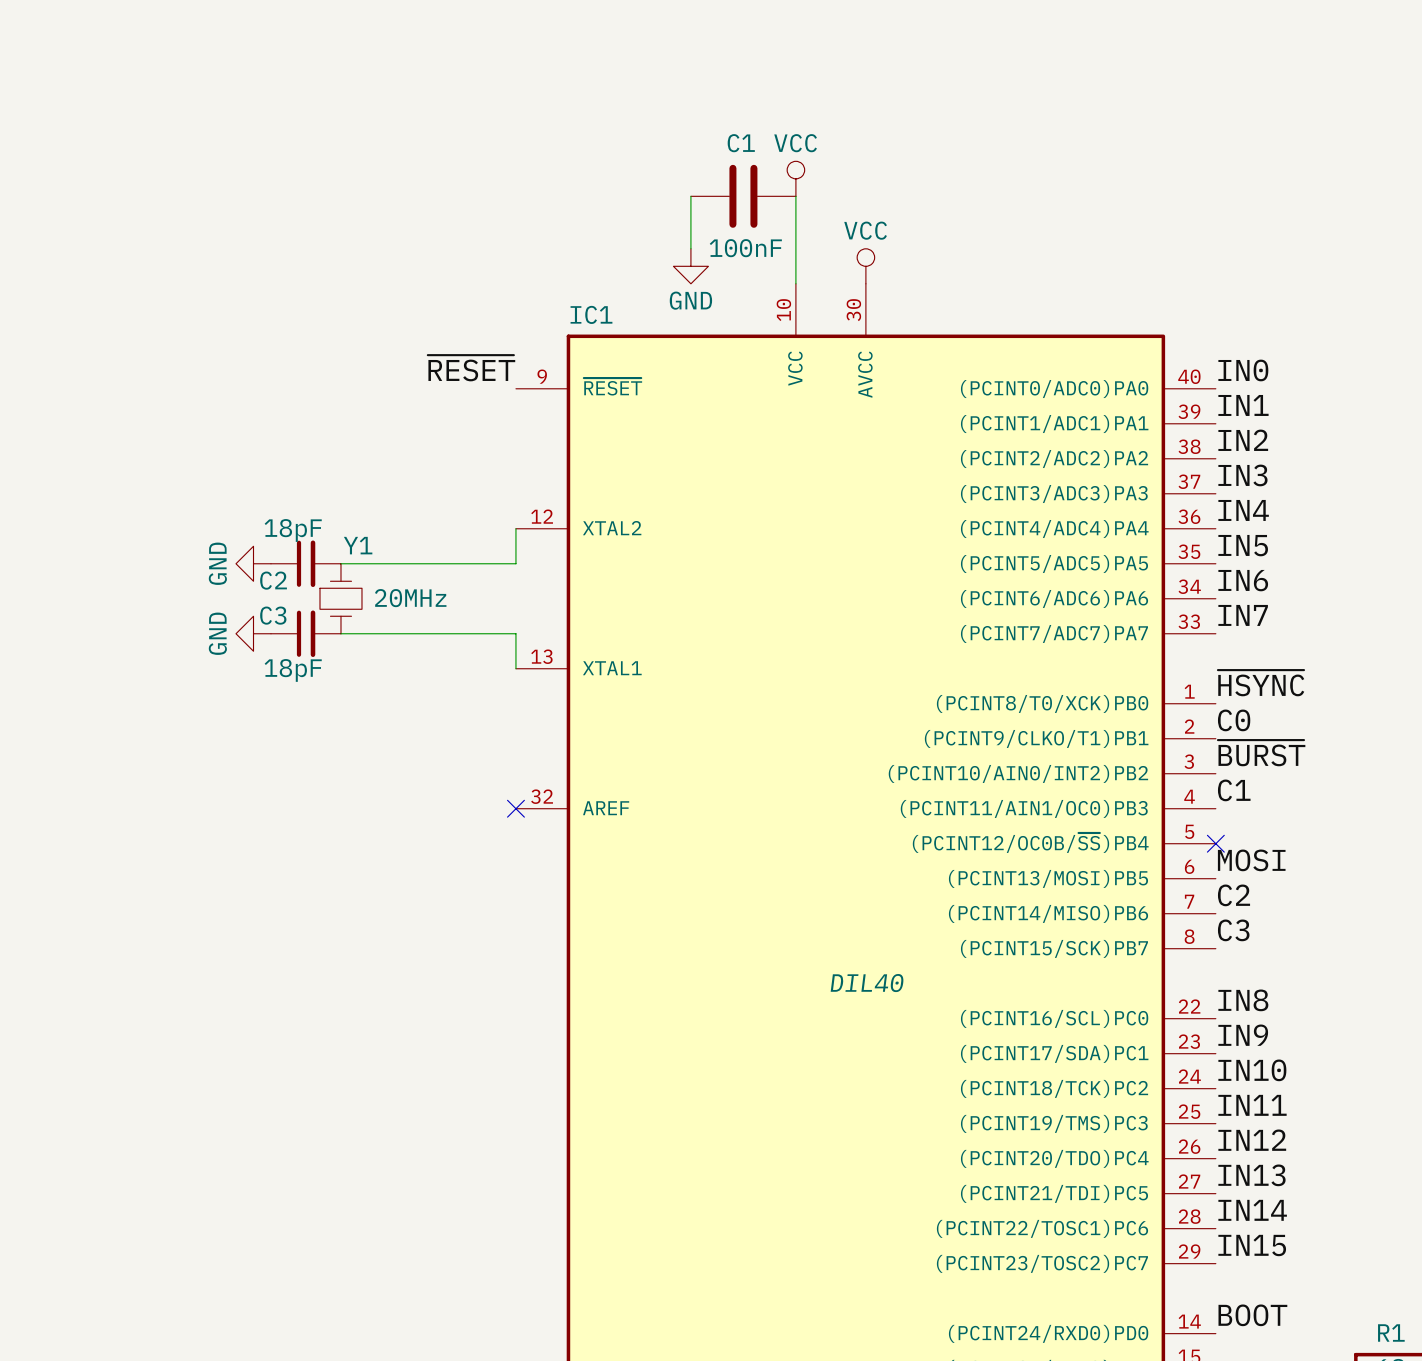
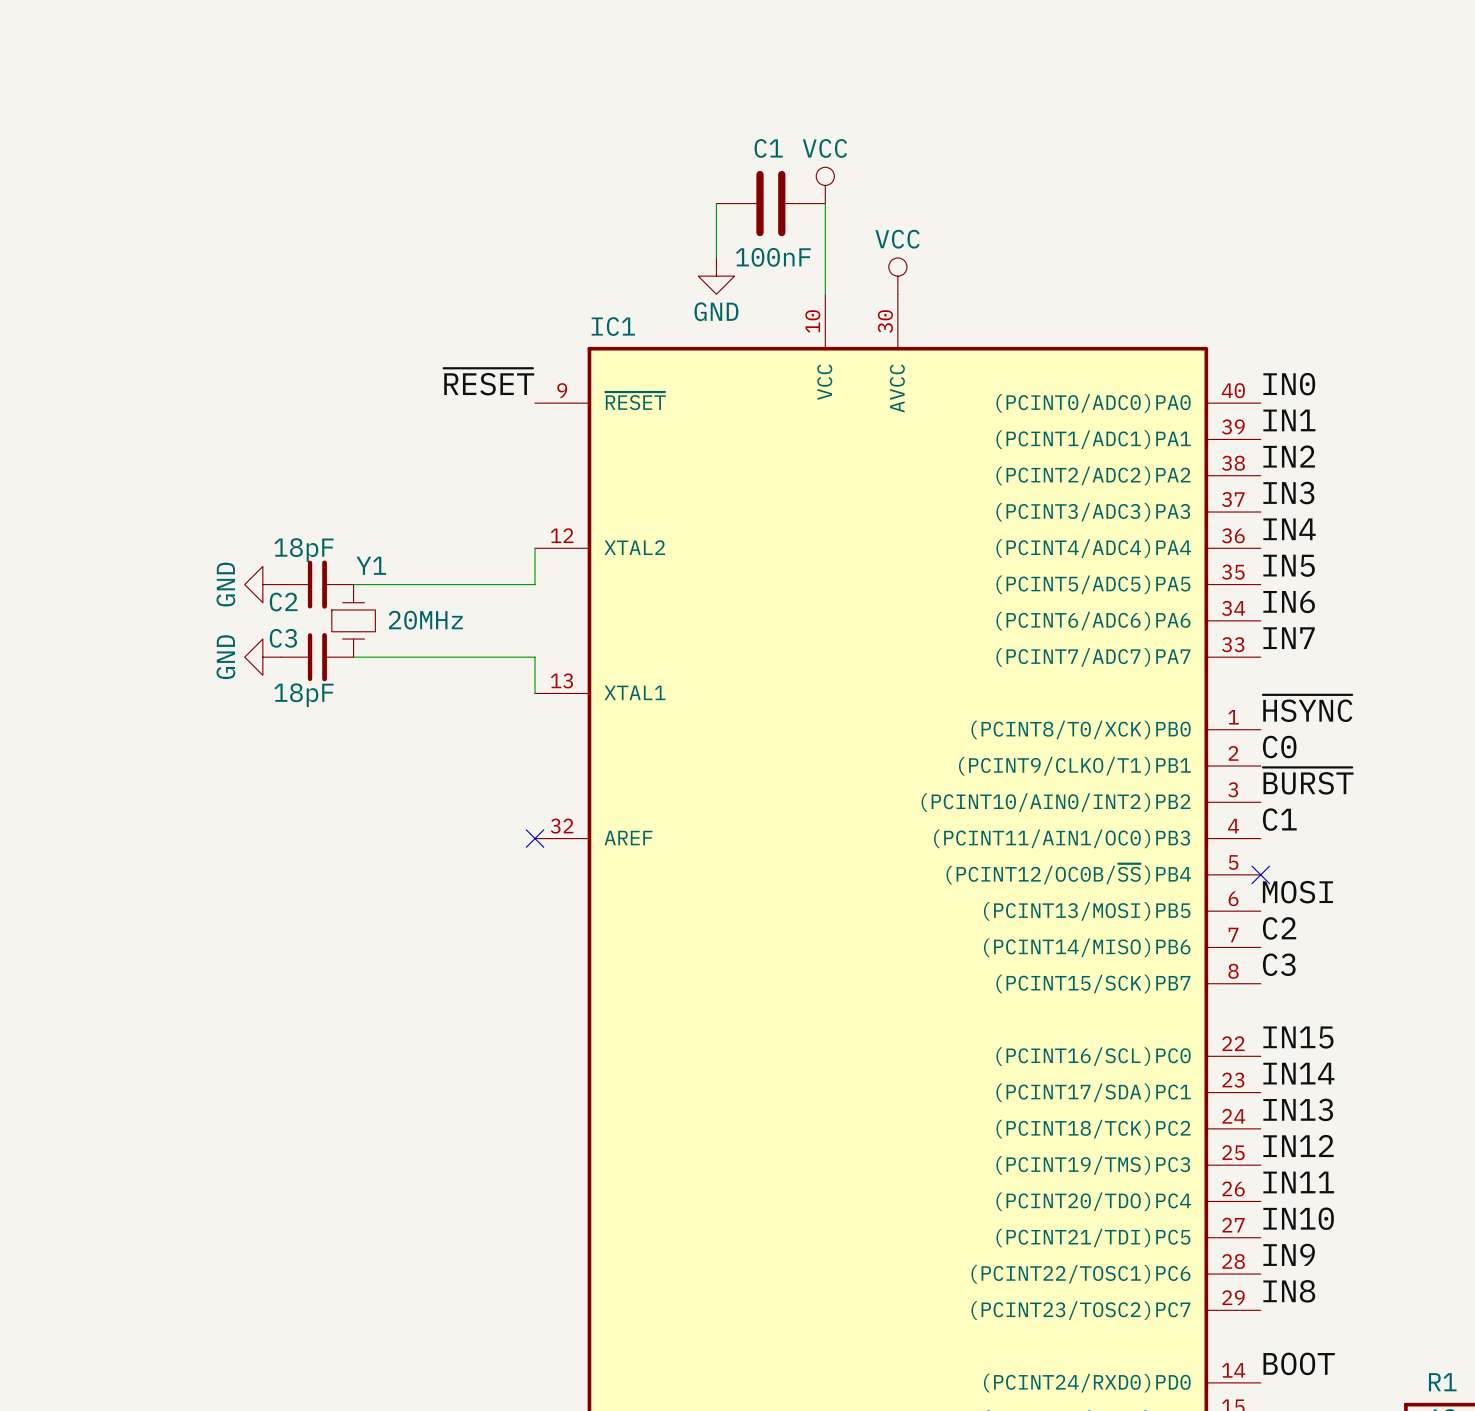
IC1 text: DIL40 (867, 983) -> none
label: IN8 (1243, 1000) -> IN15 (1298, 1037)
label: IN9 (1243, 1035) -> IN14 (1298, 1073)
label: IN10 (1252, 1070) -> IN13 (1298, 1109)
label: IN11 (1252, 1105) -> IN12 (1298, 1145)
label: IN12 (1252, 1140) -> IN11 (1298, 1182)
label: IN13 (1251, 1175) -> IN10 (1298, 1218)
label: IN14 (1252, 1210) -> IN9 (1289, 1254)
label: IN15 (1252, 1245) -> IN8 (1289, 1291)

